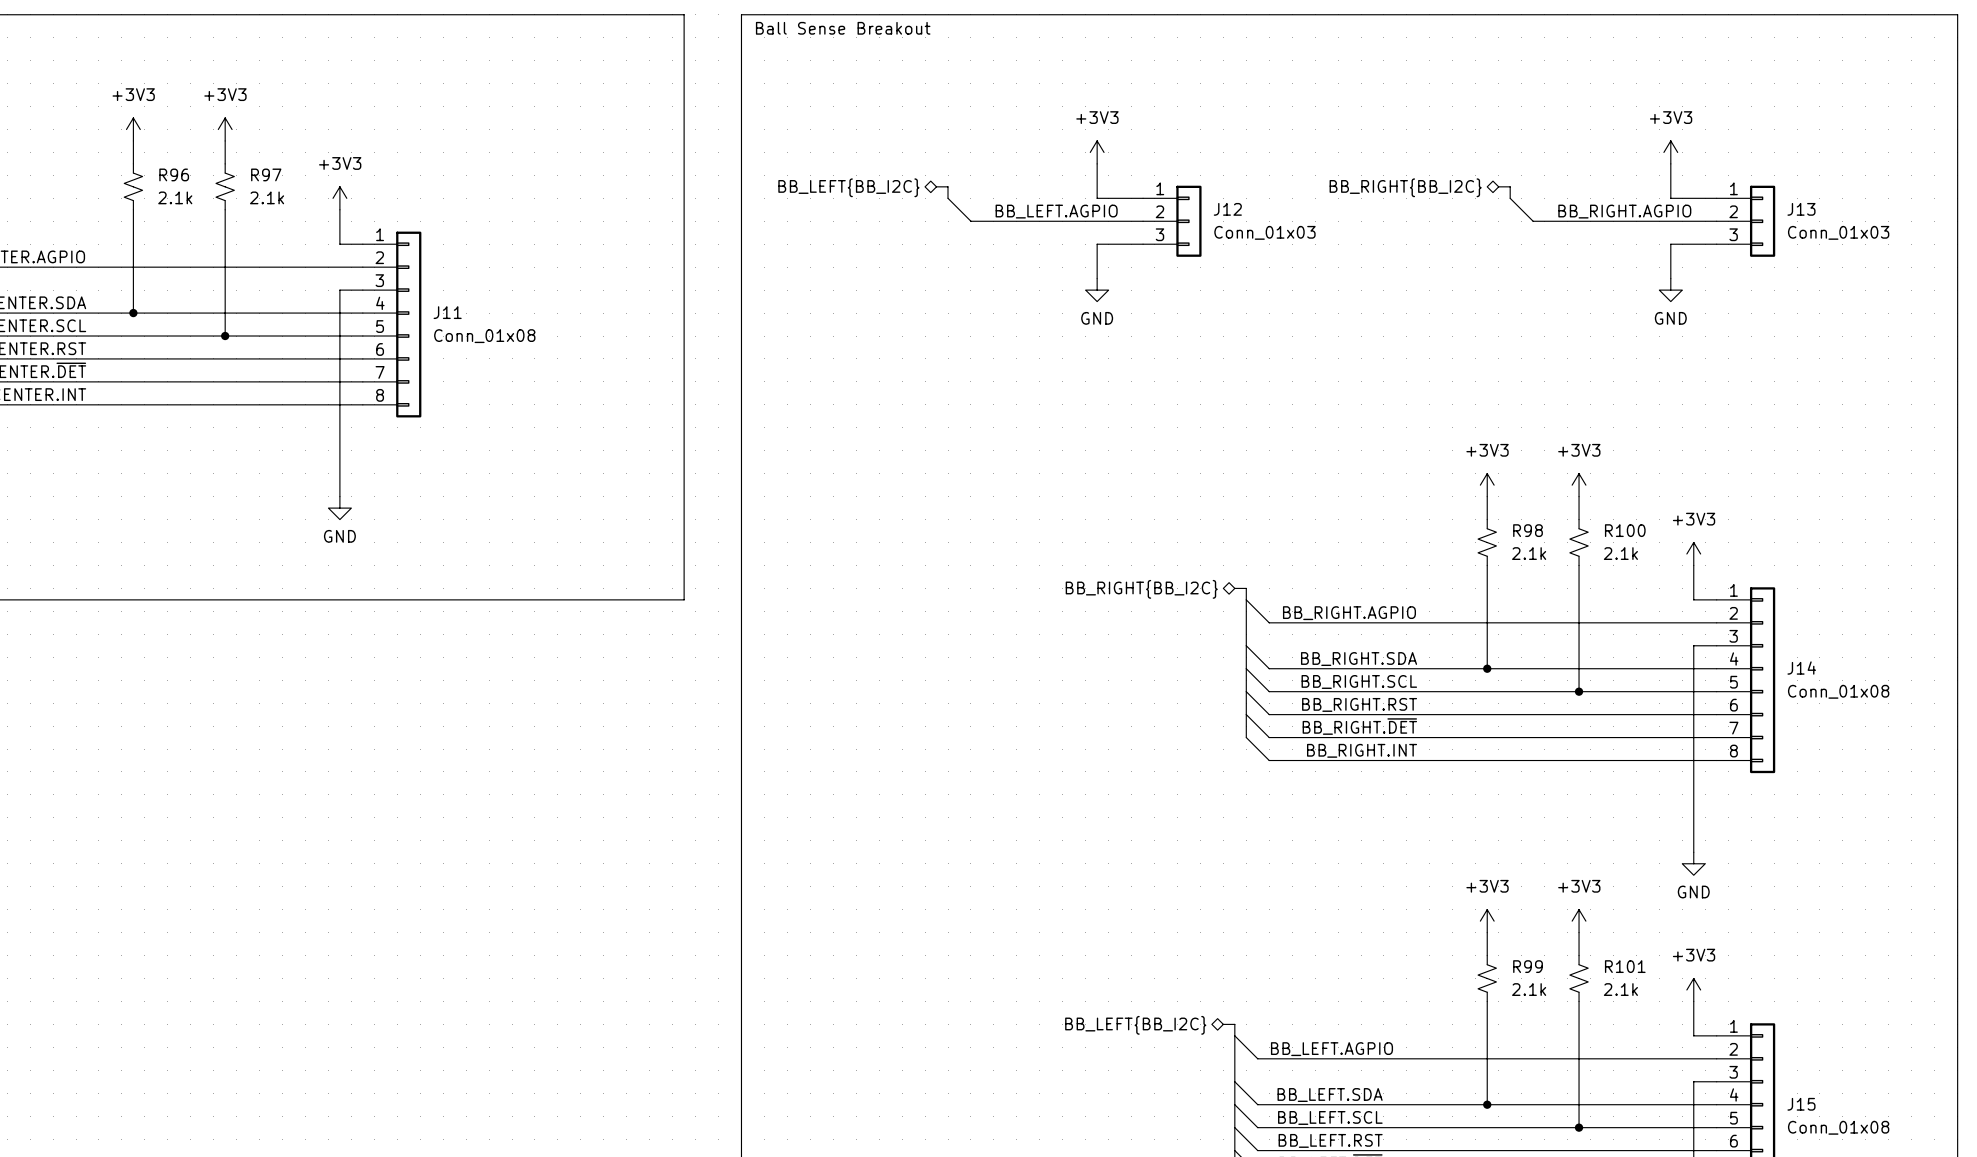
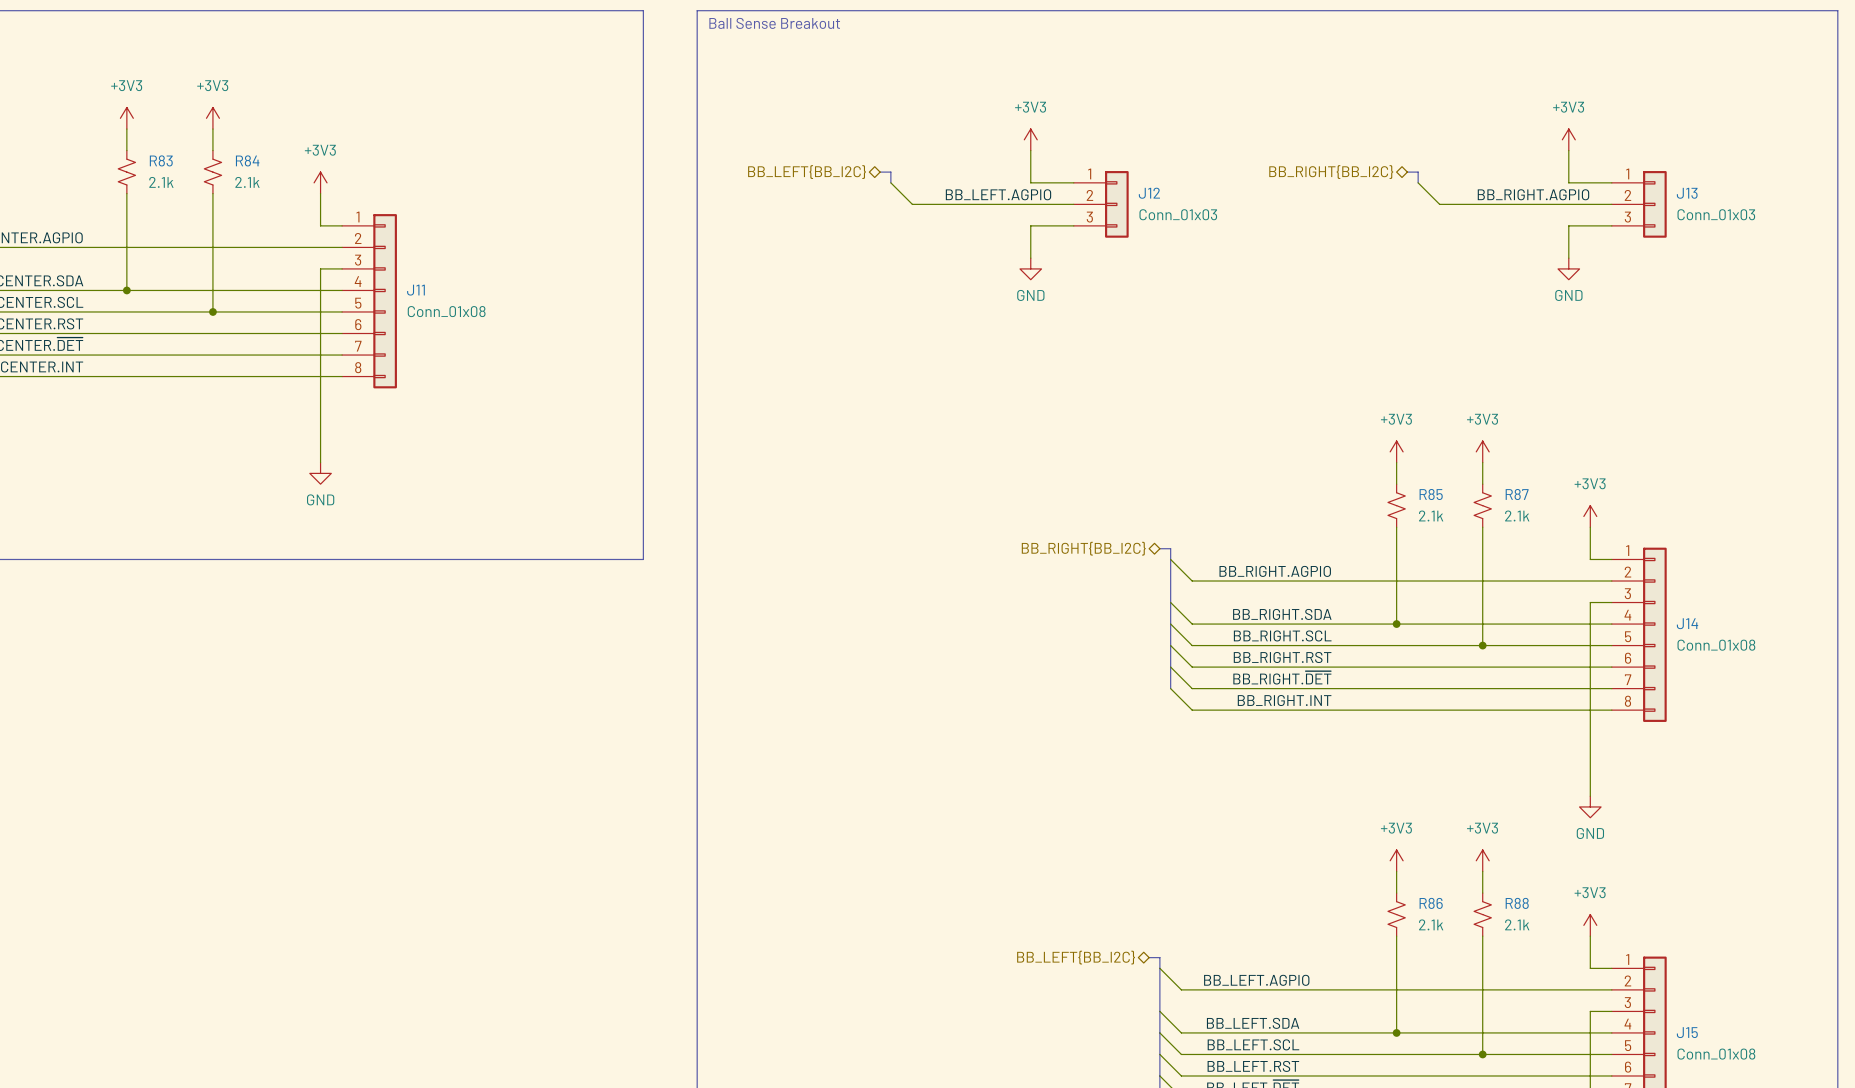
R96 name: R96 (174, 174) -> R83 (161, 160)
R97 name: R97 (266, 174) -> R84 (247, 160)
R98 name: R98 (1528, 530) -> R85 (1431, 494)
R100 name: R100 (1625, 530) -> R87 (1517, 494)
R99 name: R99 (1528, 966) -> R86 (1431, 903)
R101 name: R101 (1625, 966) -> R88 (1517, 903)

